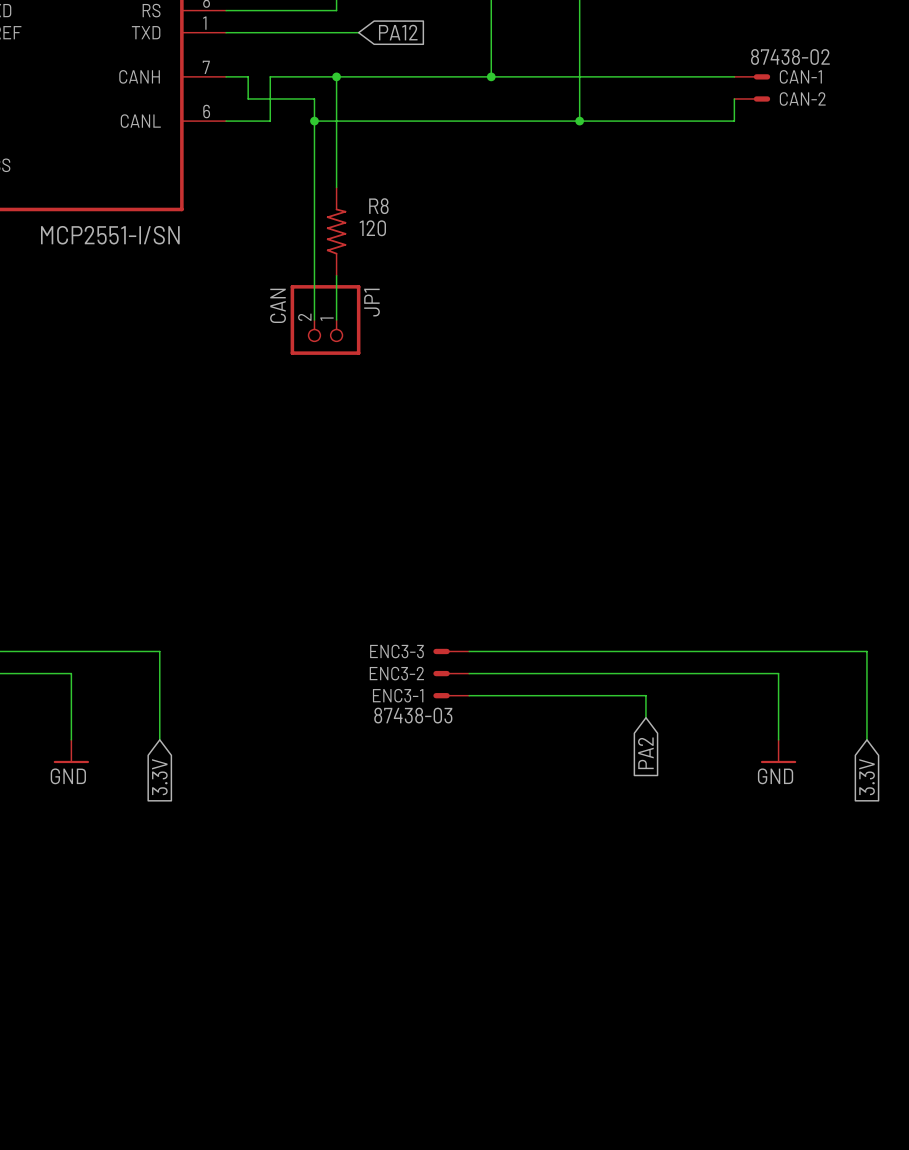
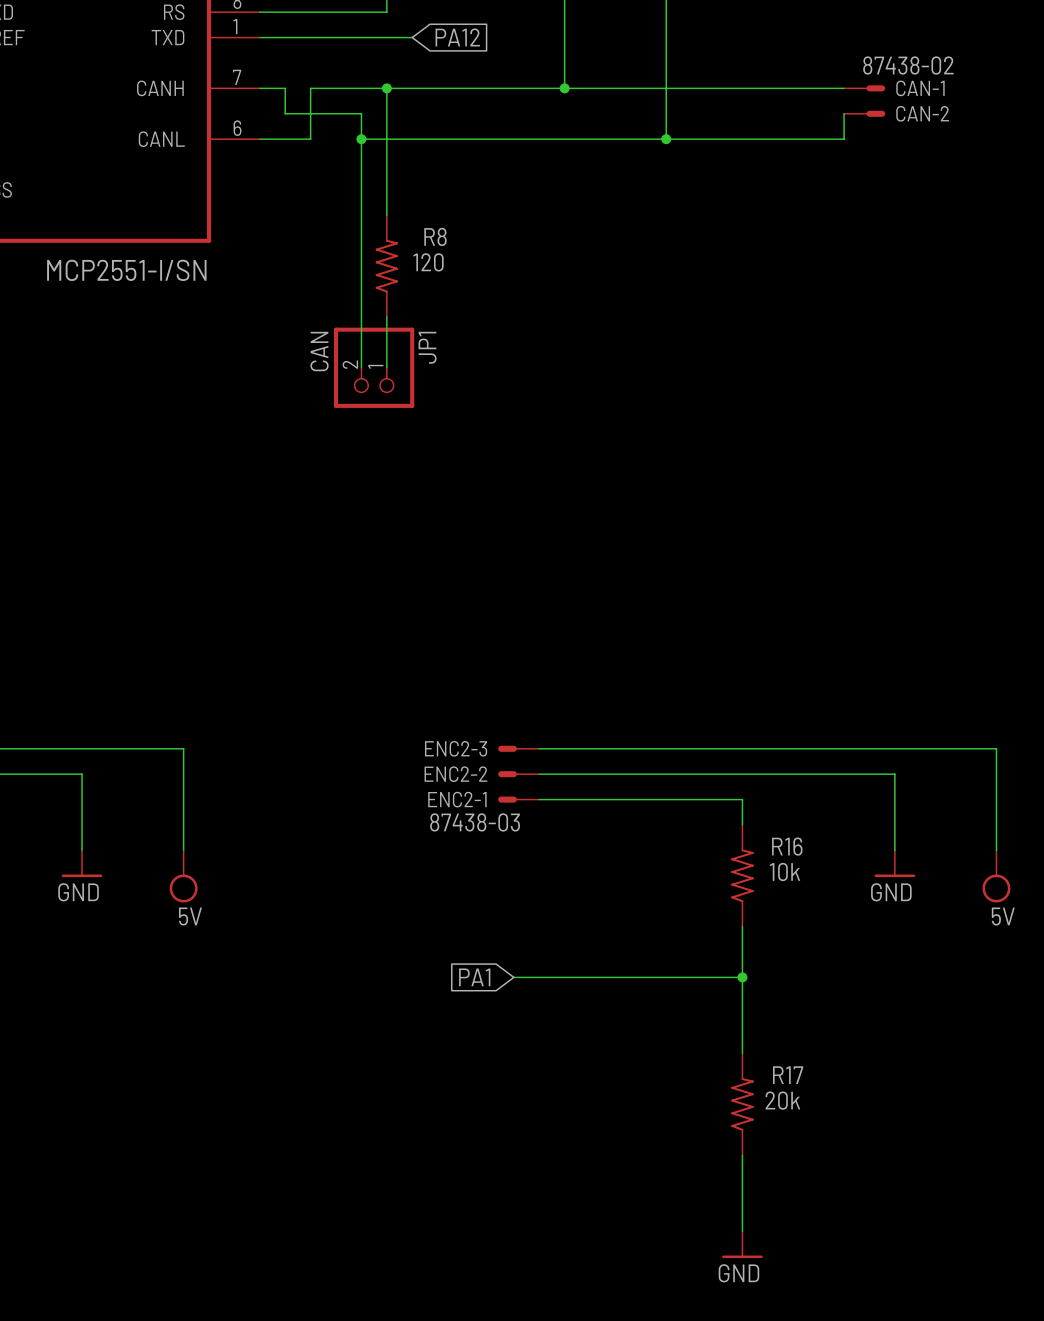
ENC3-3 name: ENC3-3 (396, 651) -> ENC2-3 (456, 748)
ENC3-2 name: ENC3-2 (396, 673) -> ENC2-2 (455, 774)
ENC3-1 name: ENC3-1 (398, 695) -> ENC2-1 (457, 799)
global label: PA2 (645, 753) -> none
R16: none -> 10k (742, 875)
power symbol: none -> 5V (183, 876)
power symbol: none -> 5V (996, 876)
global label: 3.3V (159, 777) -> none
global label: 3.3V (867, 777) -> none
wire: none -> (742, 926) (742, 1053)
global label: none -> PA1 (474, 977)
wire: none -> (513, 977) (742, 977)
junction: none -> (742, 977)
R17: none -> 20k (742, 1104)
wire: none -> (742, 1155) (742, 1231)
power symbol: none -> GND (742, 1244)

